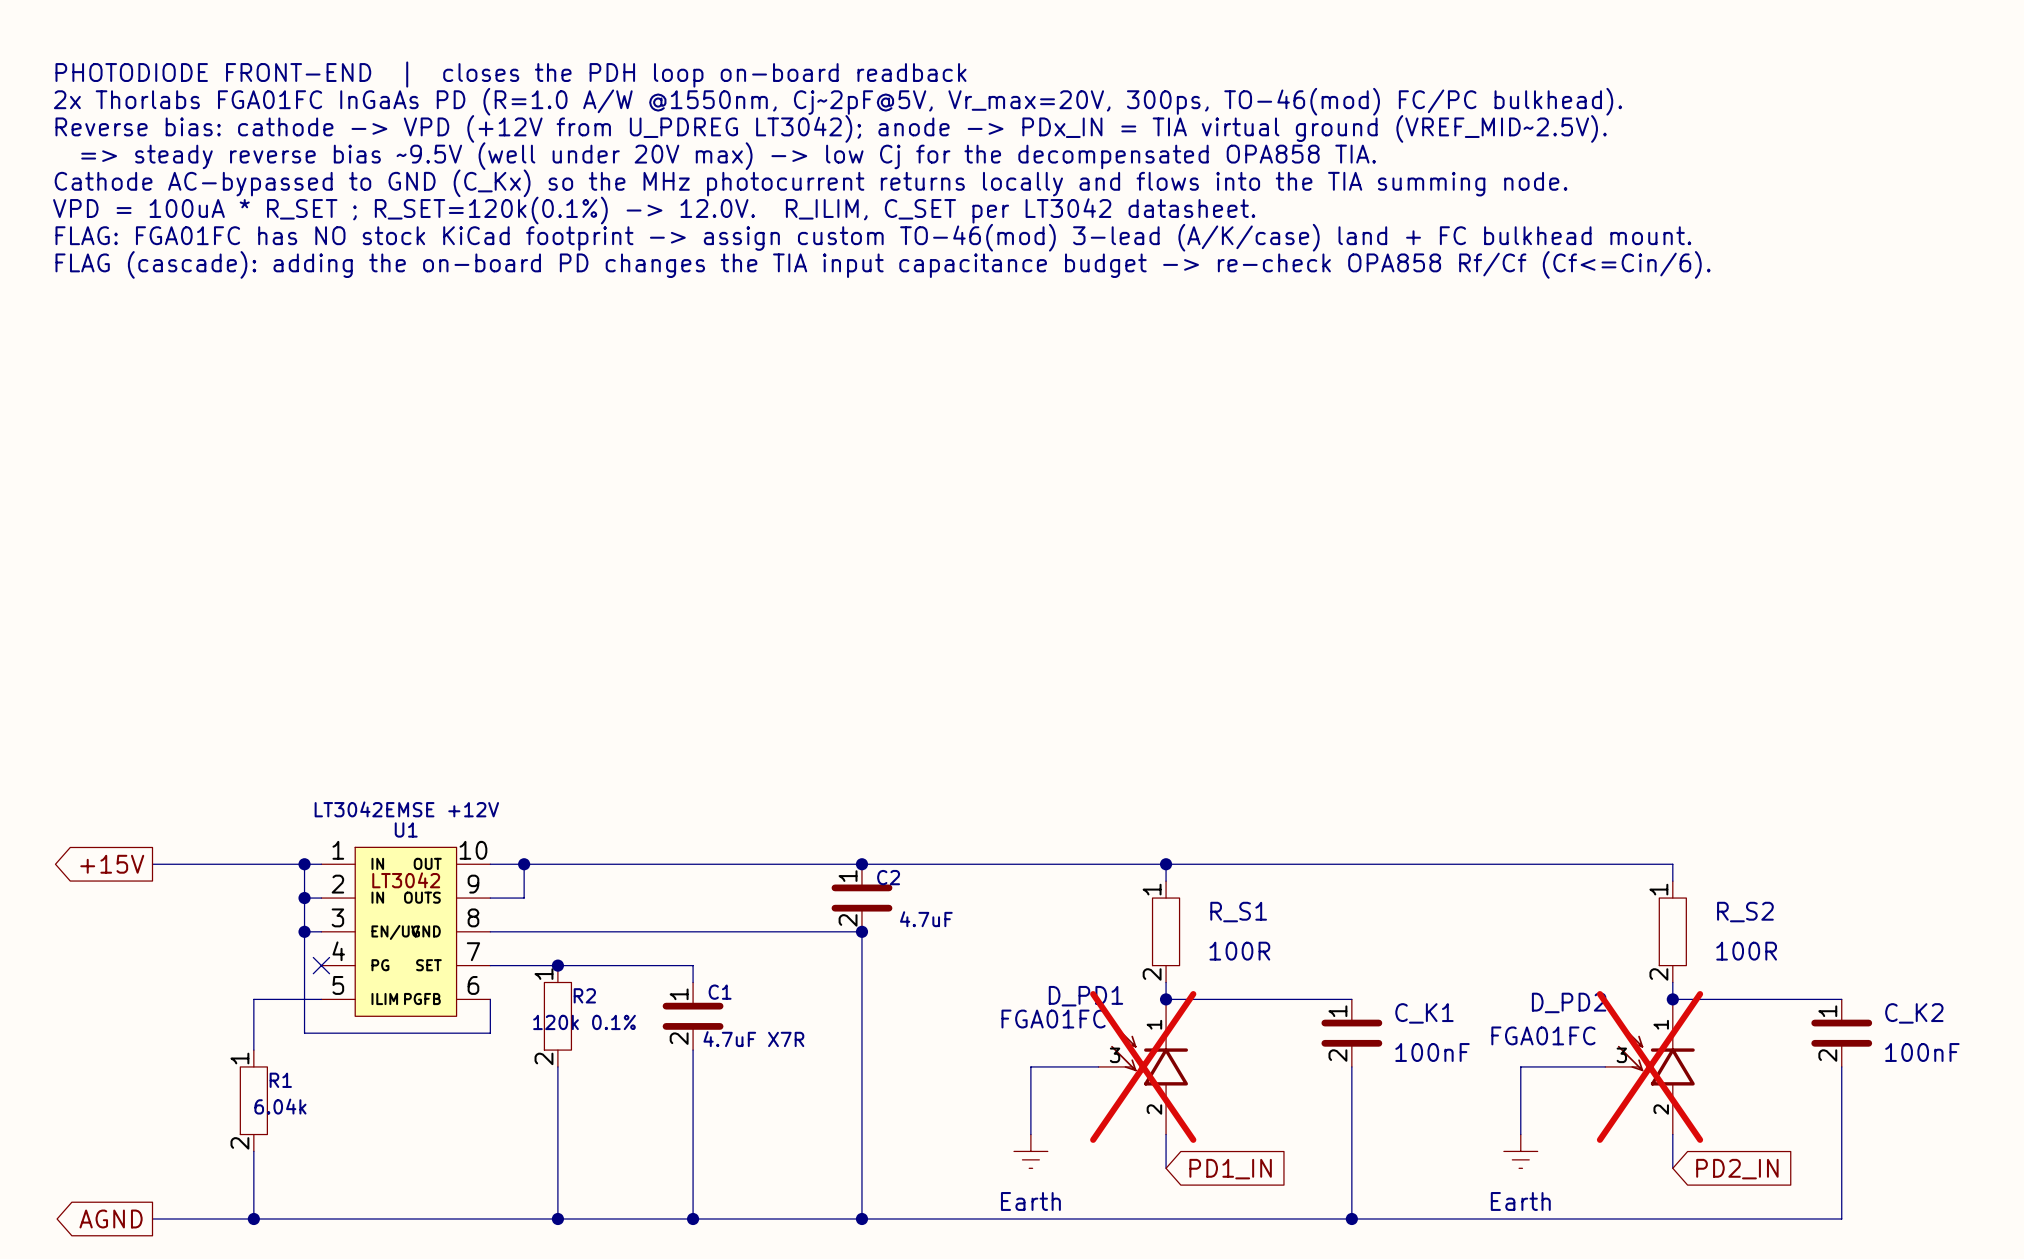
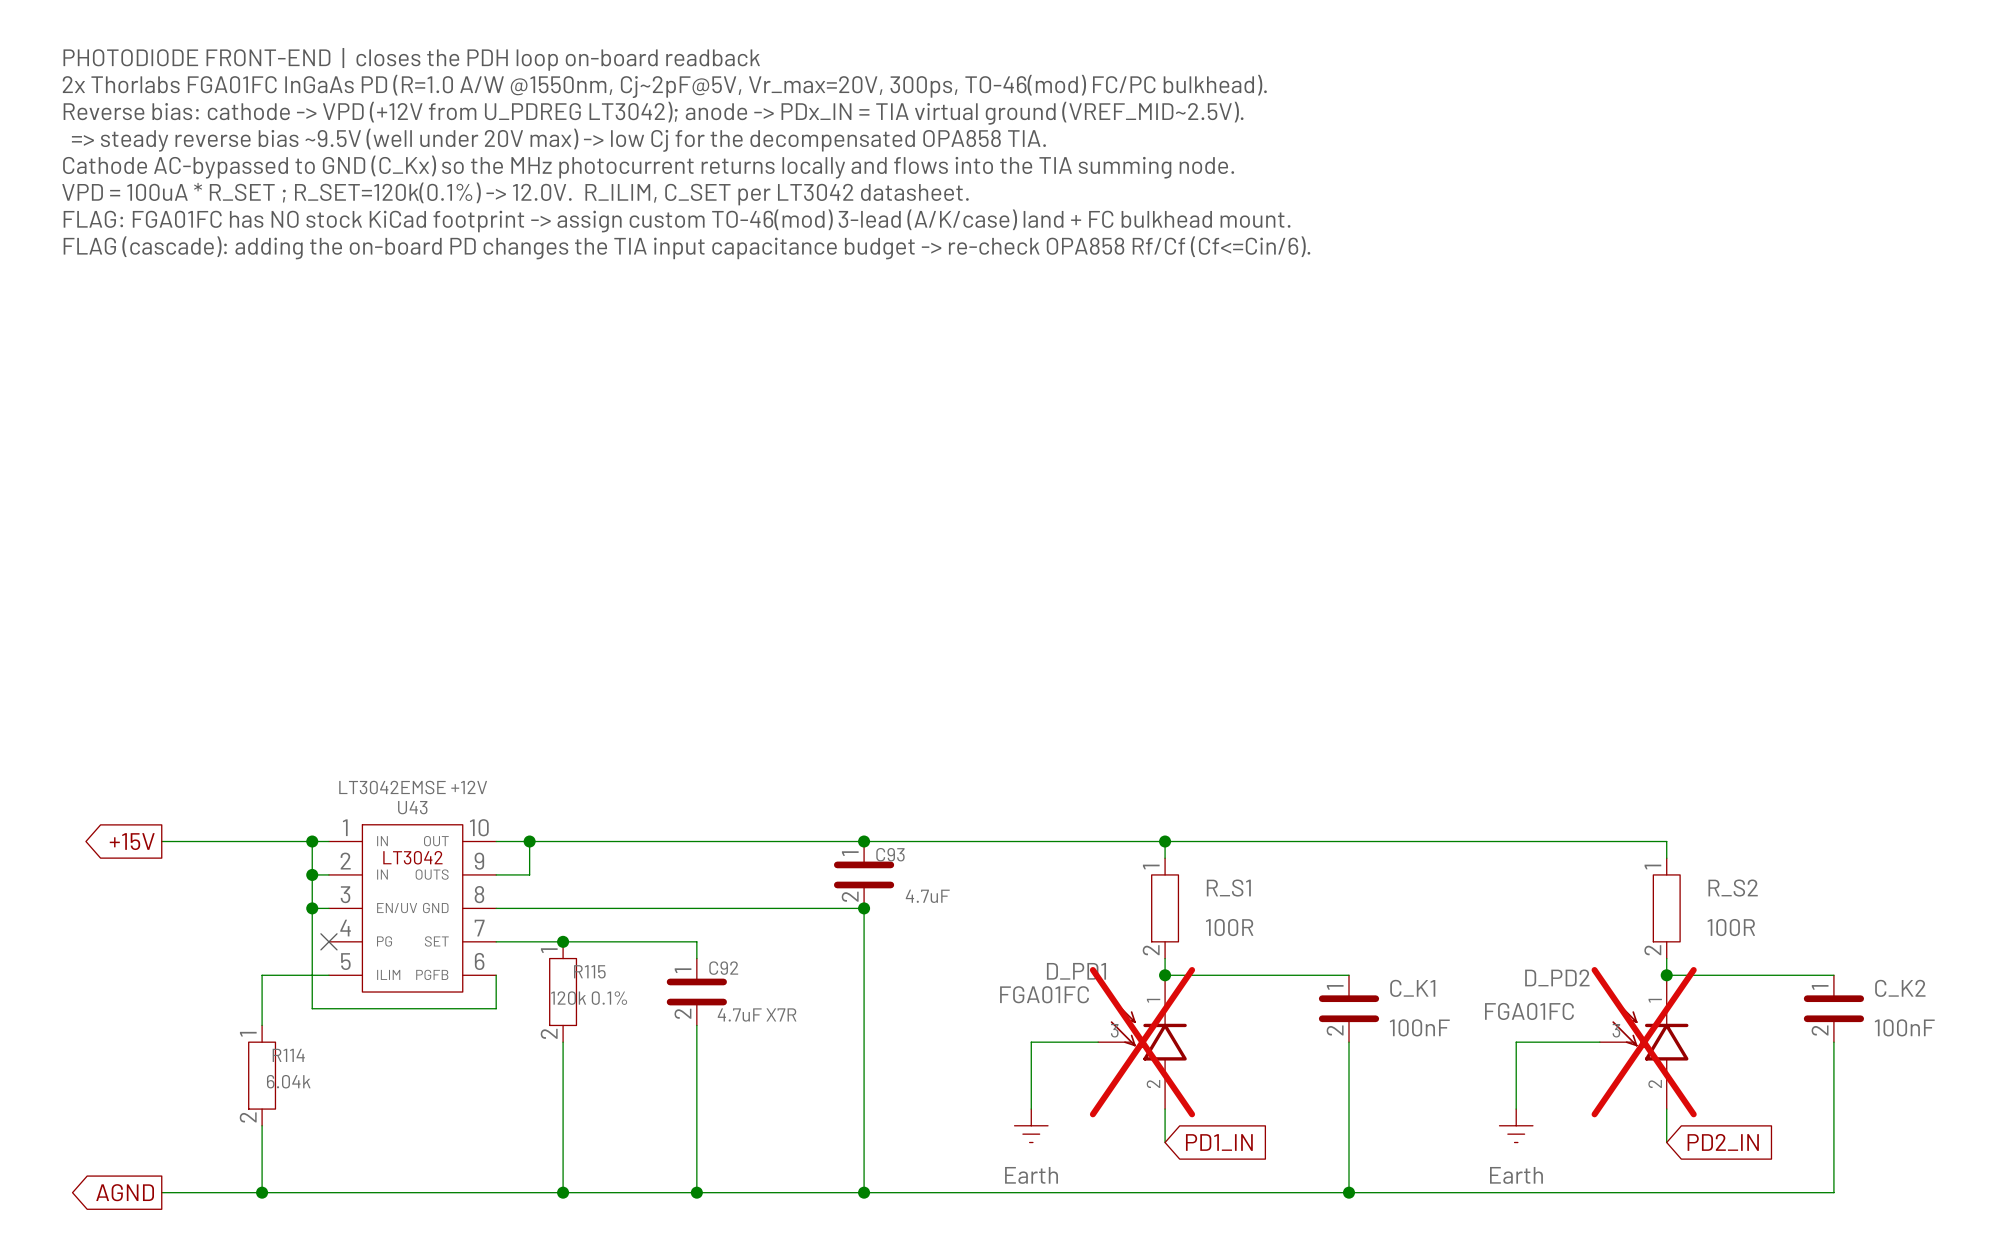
U1 name: U1 (406, 829) -> U43 (412, 807)
C2 name: C2 (888, 877) -> C93 (890, 854)
C1 name: C1 (720, 992) -> C92 (723, 968)
R2 name: R2 (584, 995) -> R115 (589, 971)
R1 name: R1 (280, 1080) -> R114 (288, 1055)

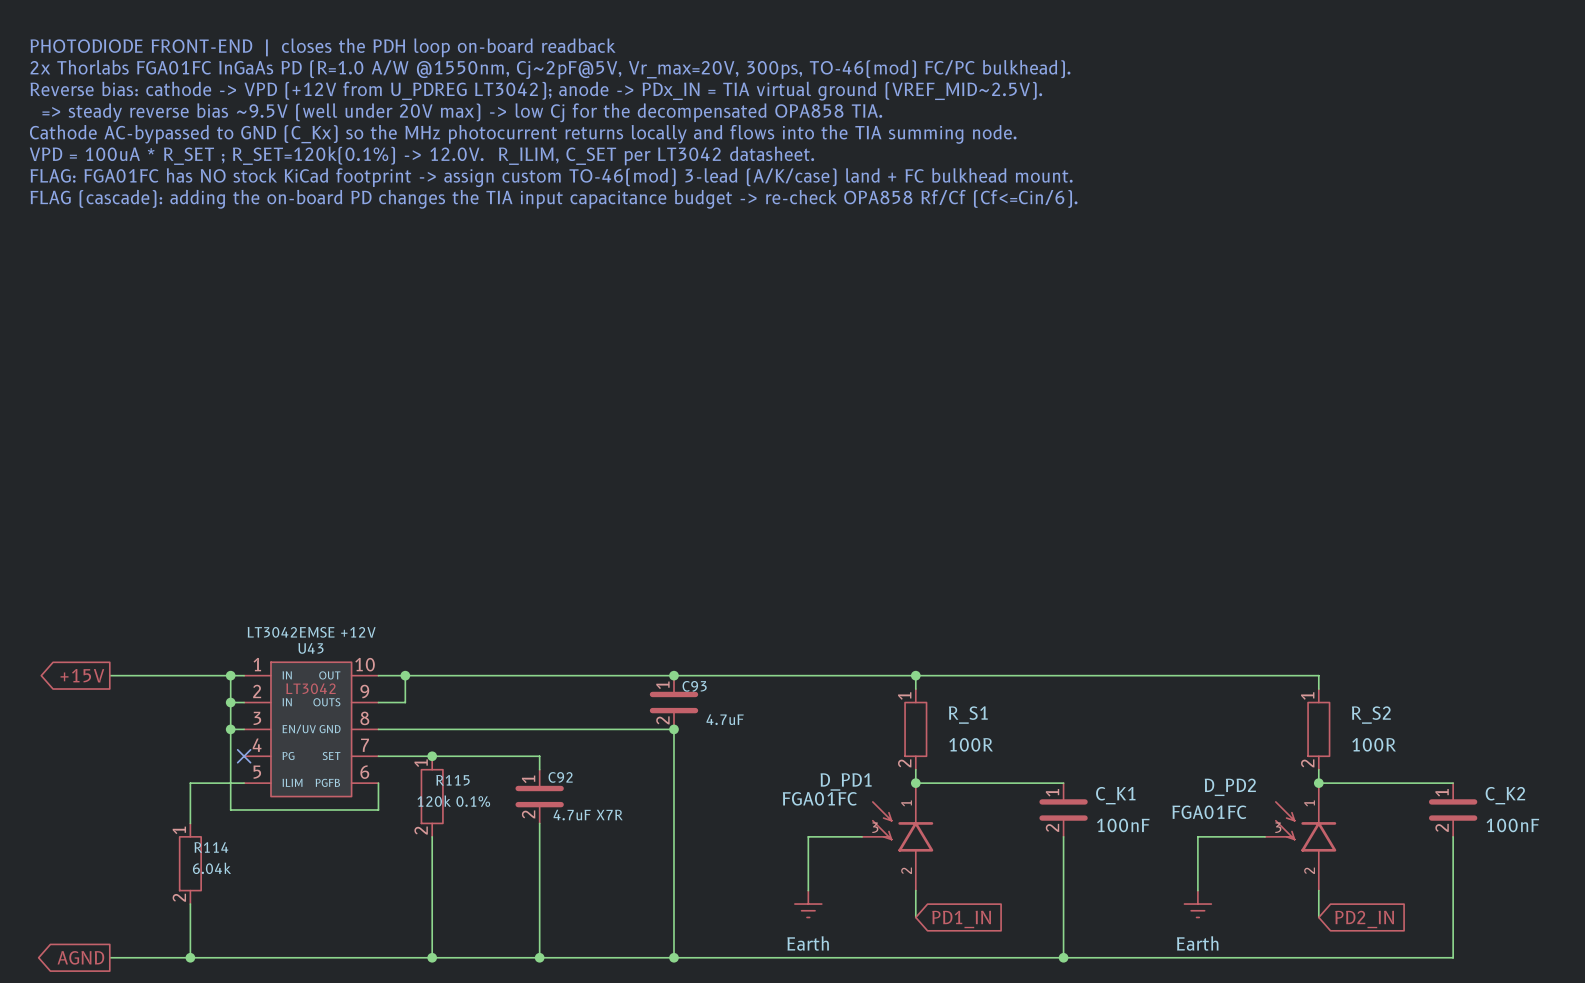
D_PD1 do-not-place cross: (1142, 1042) -> none
D_PD2 do-not-place cross: (1644, 1042) -> none

